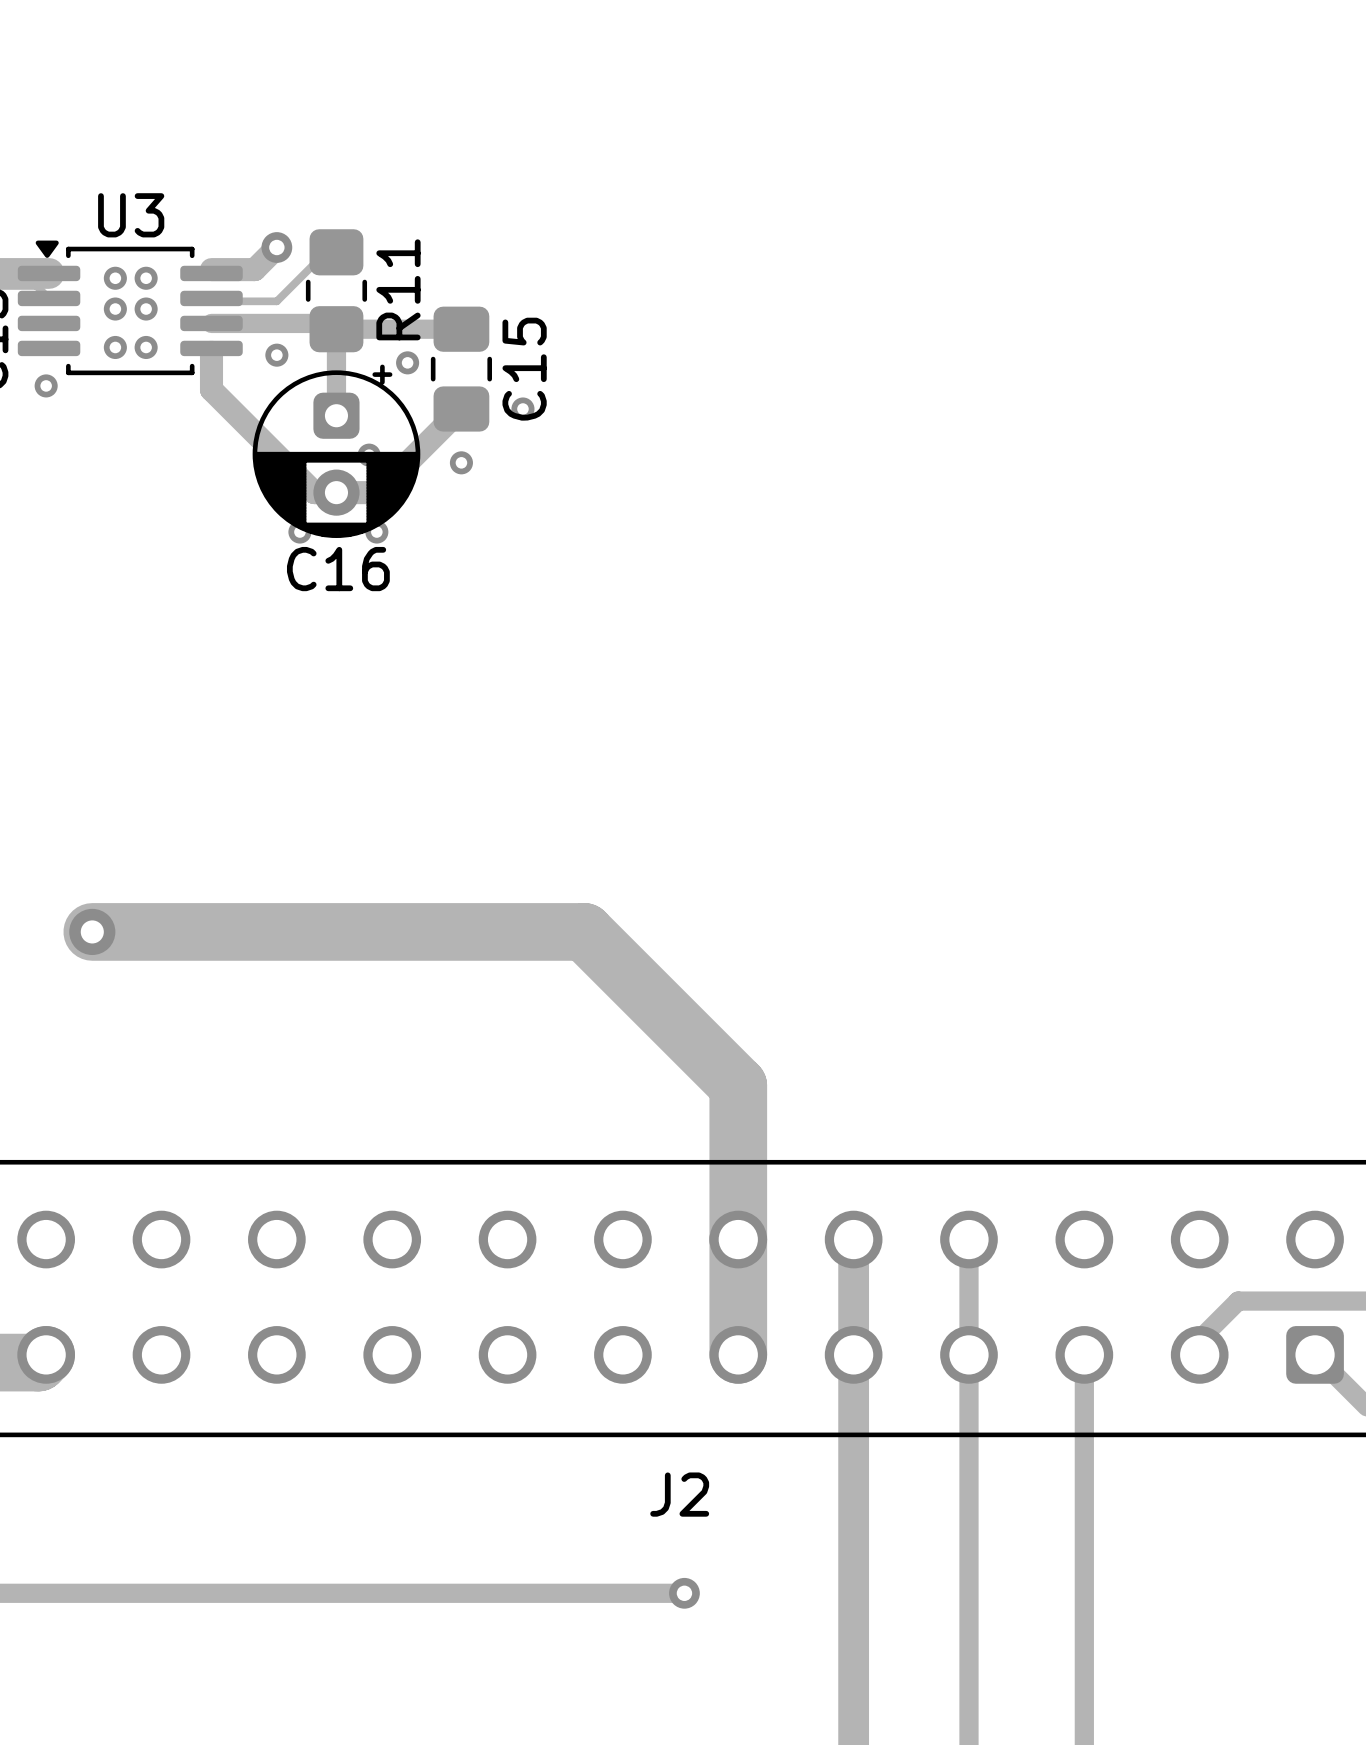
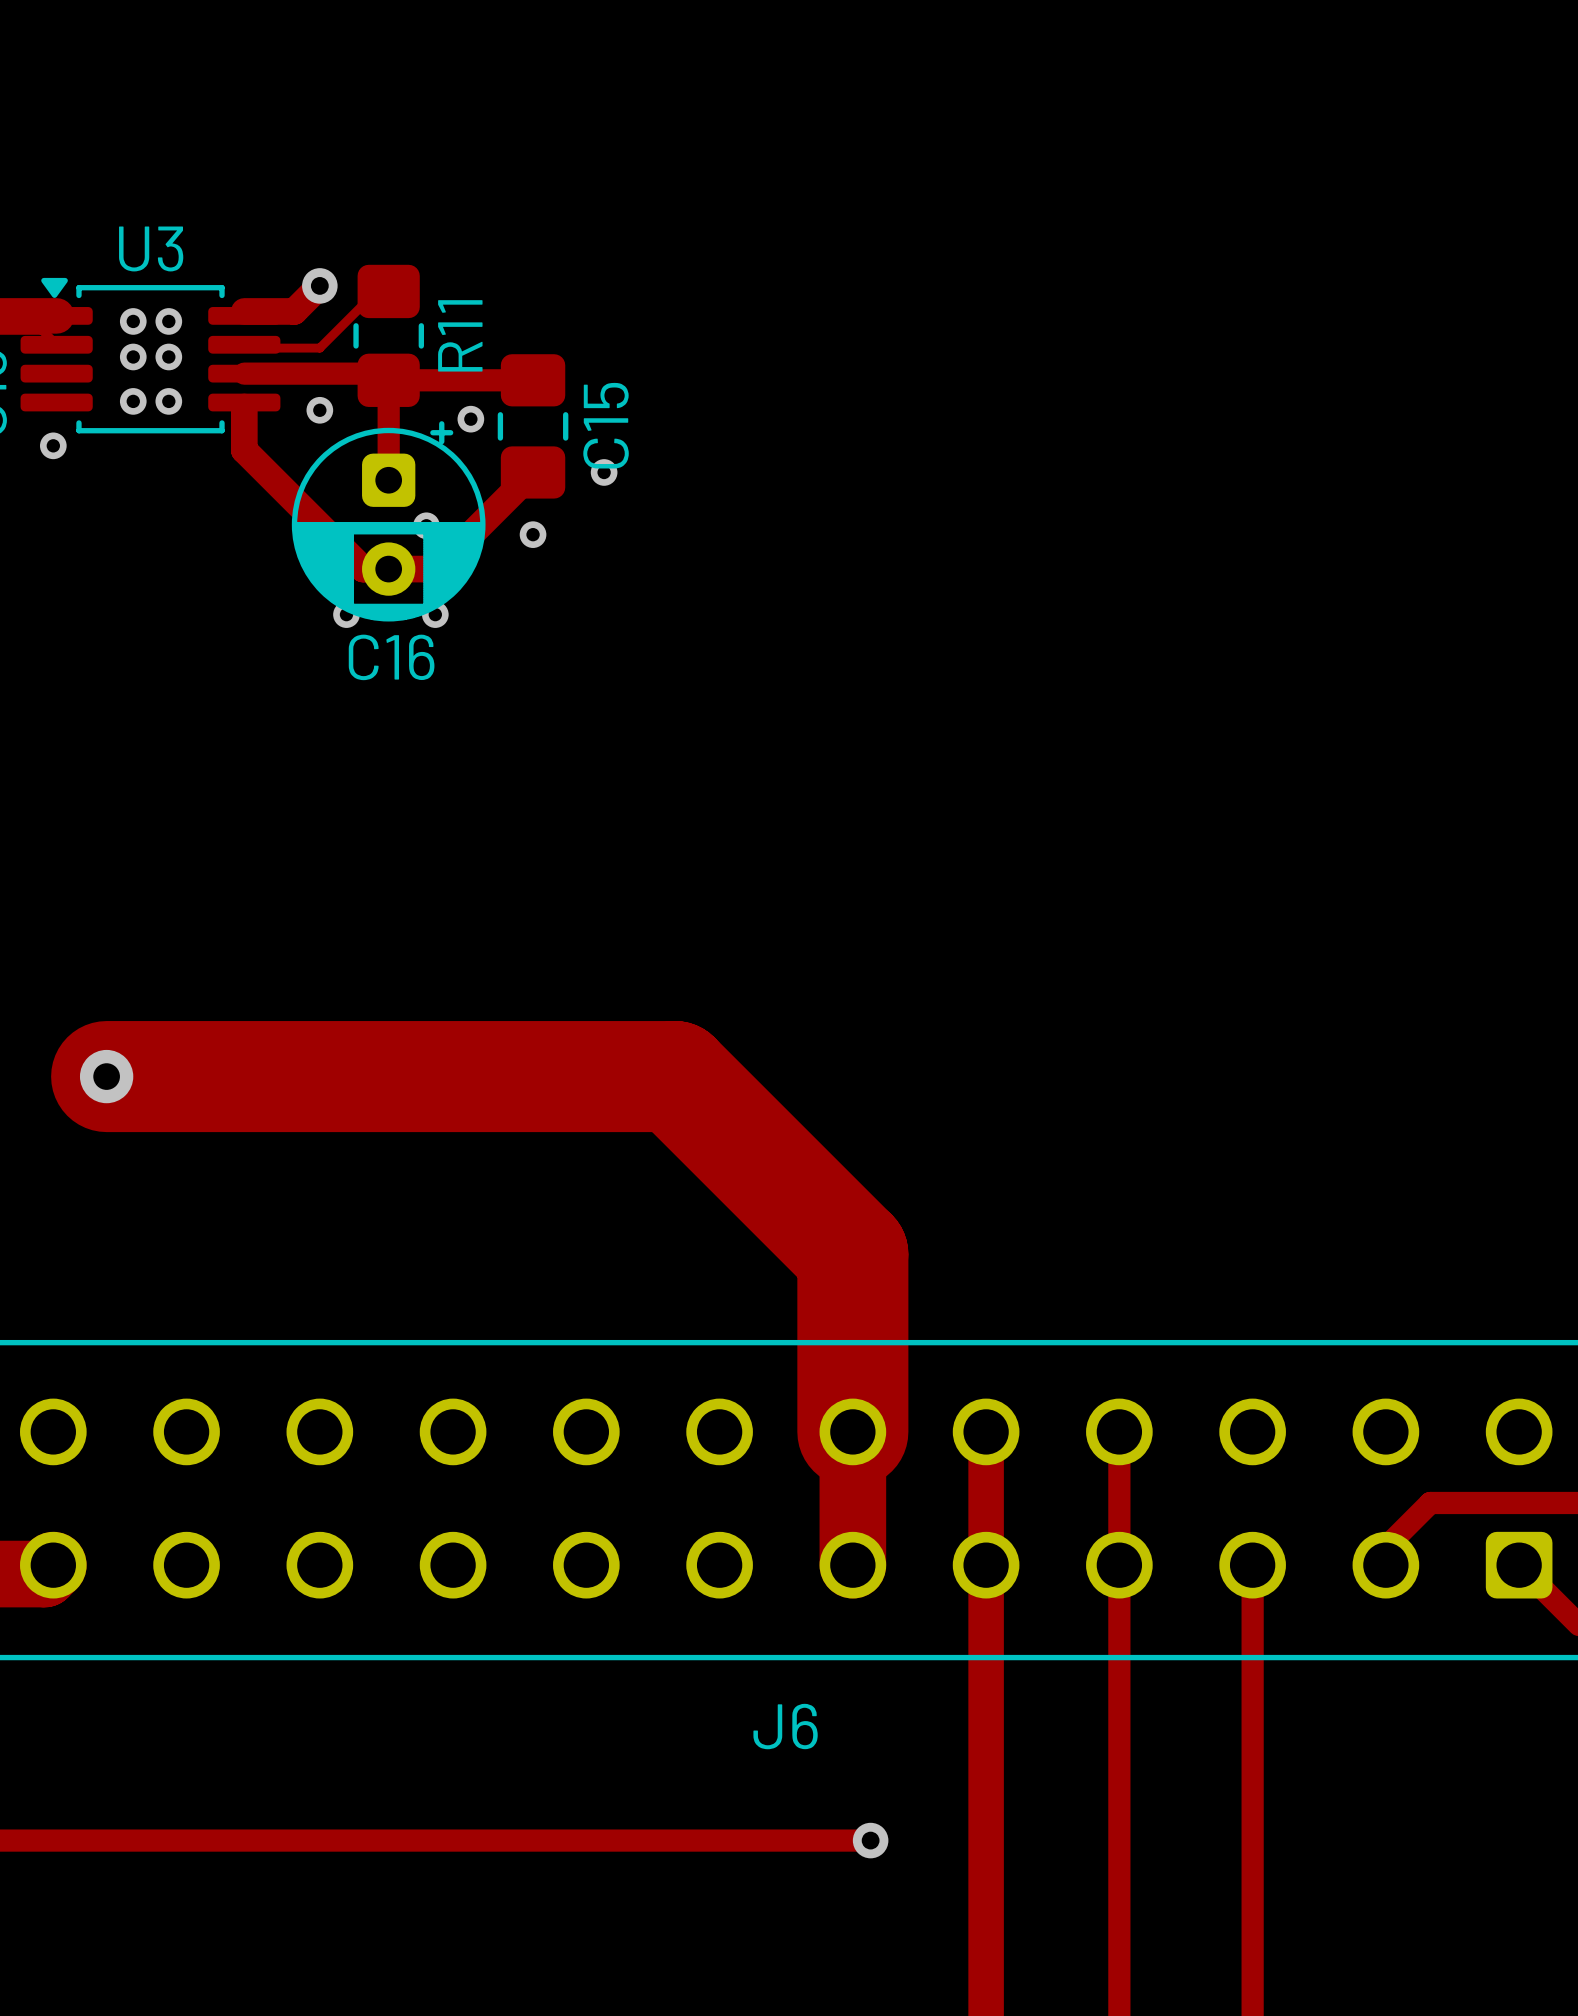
track width: thin (92, 931) (584, 931) (738, 1085) (738, 1239) -> thick (106, 1076) (675, 1076) (852, 1254) (852, 1431)
J2 name: J2 (679, 1494) -> J6 (785, 1726)
track: none -> (790, 1840) (870, 1840)
via position: (684, 1593) -> (870, 1840)

